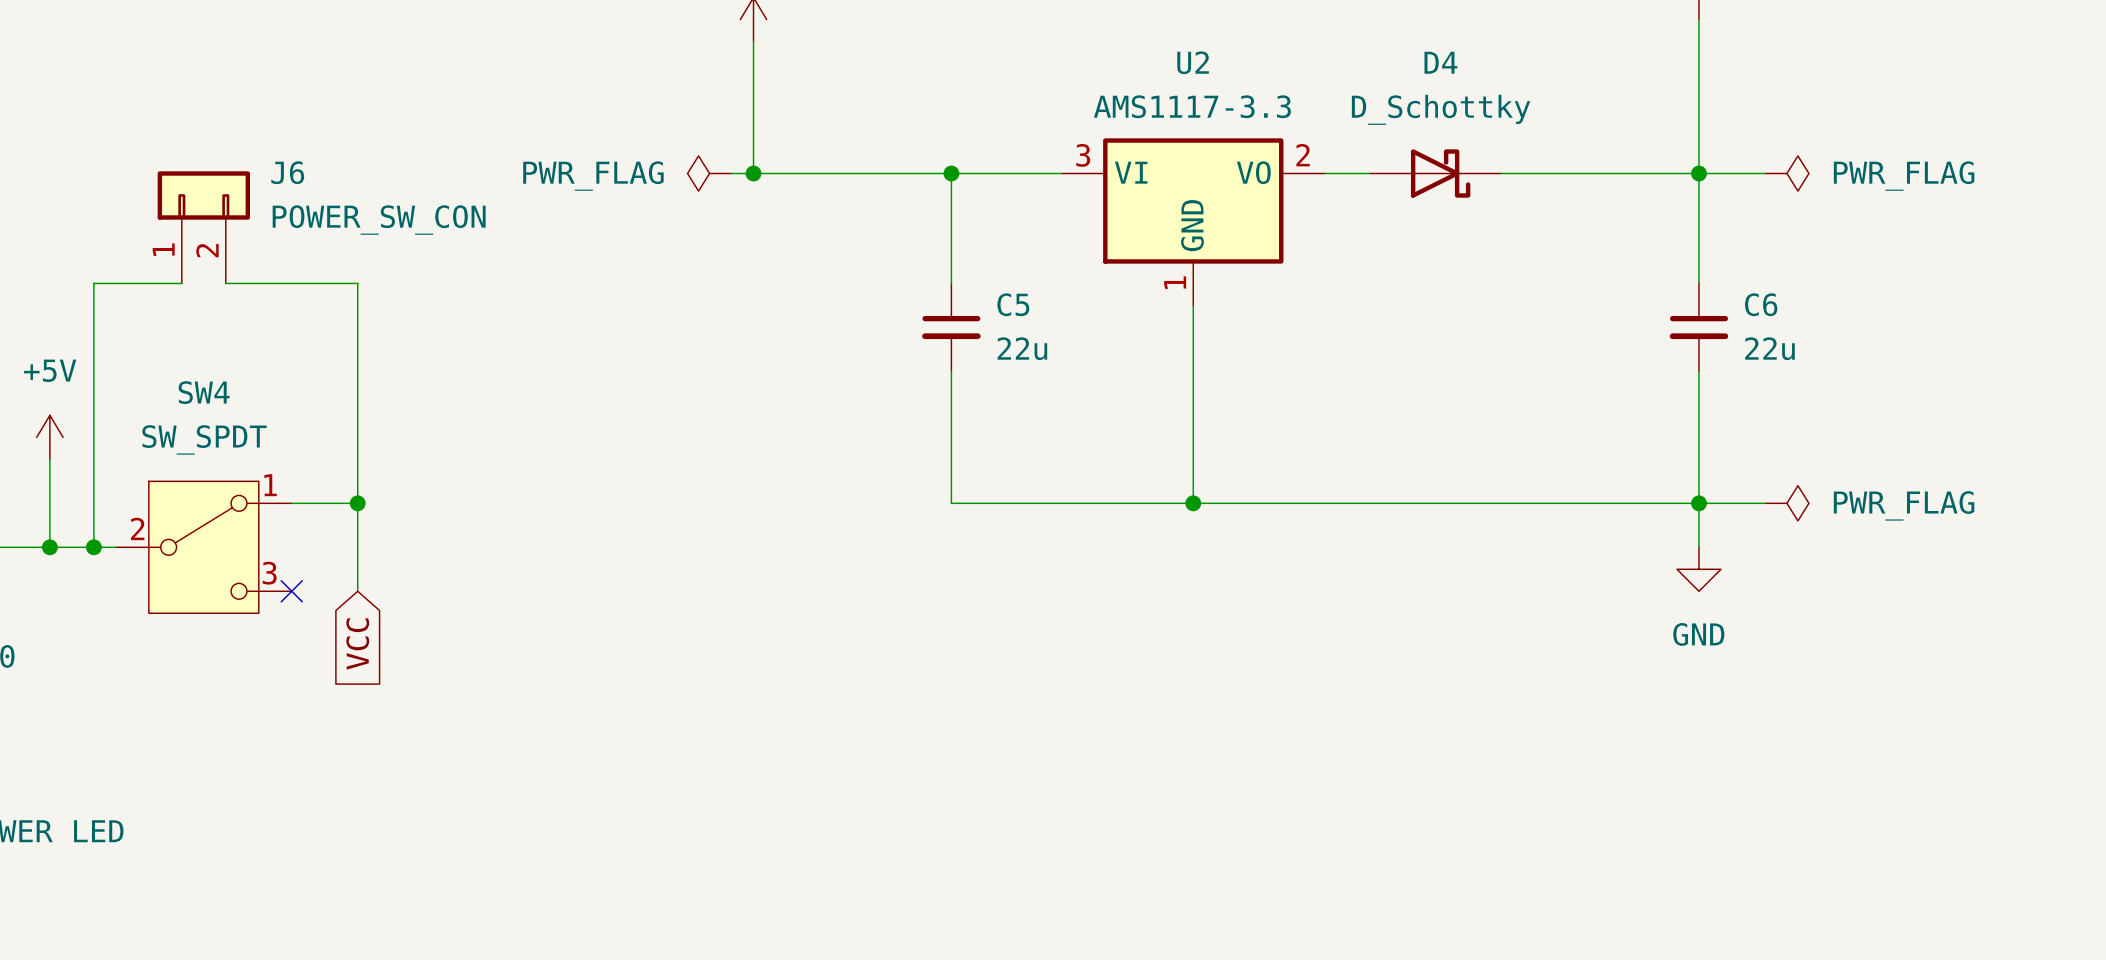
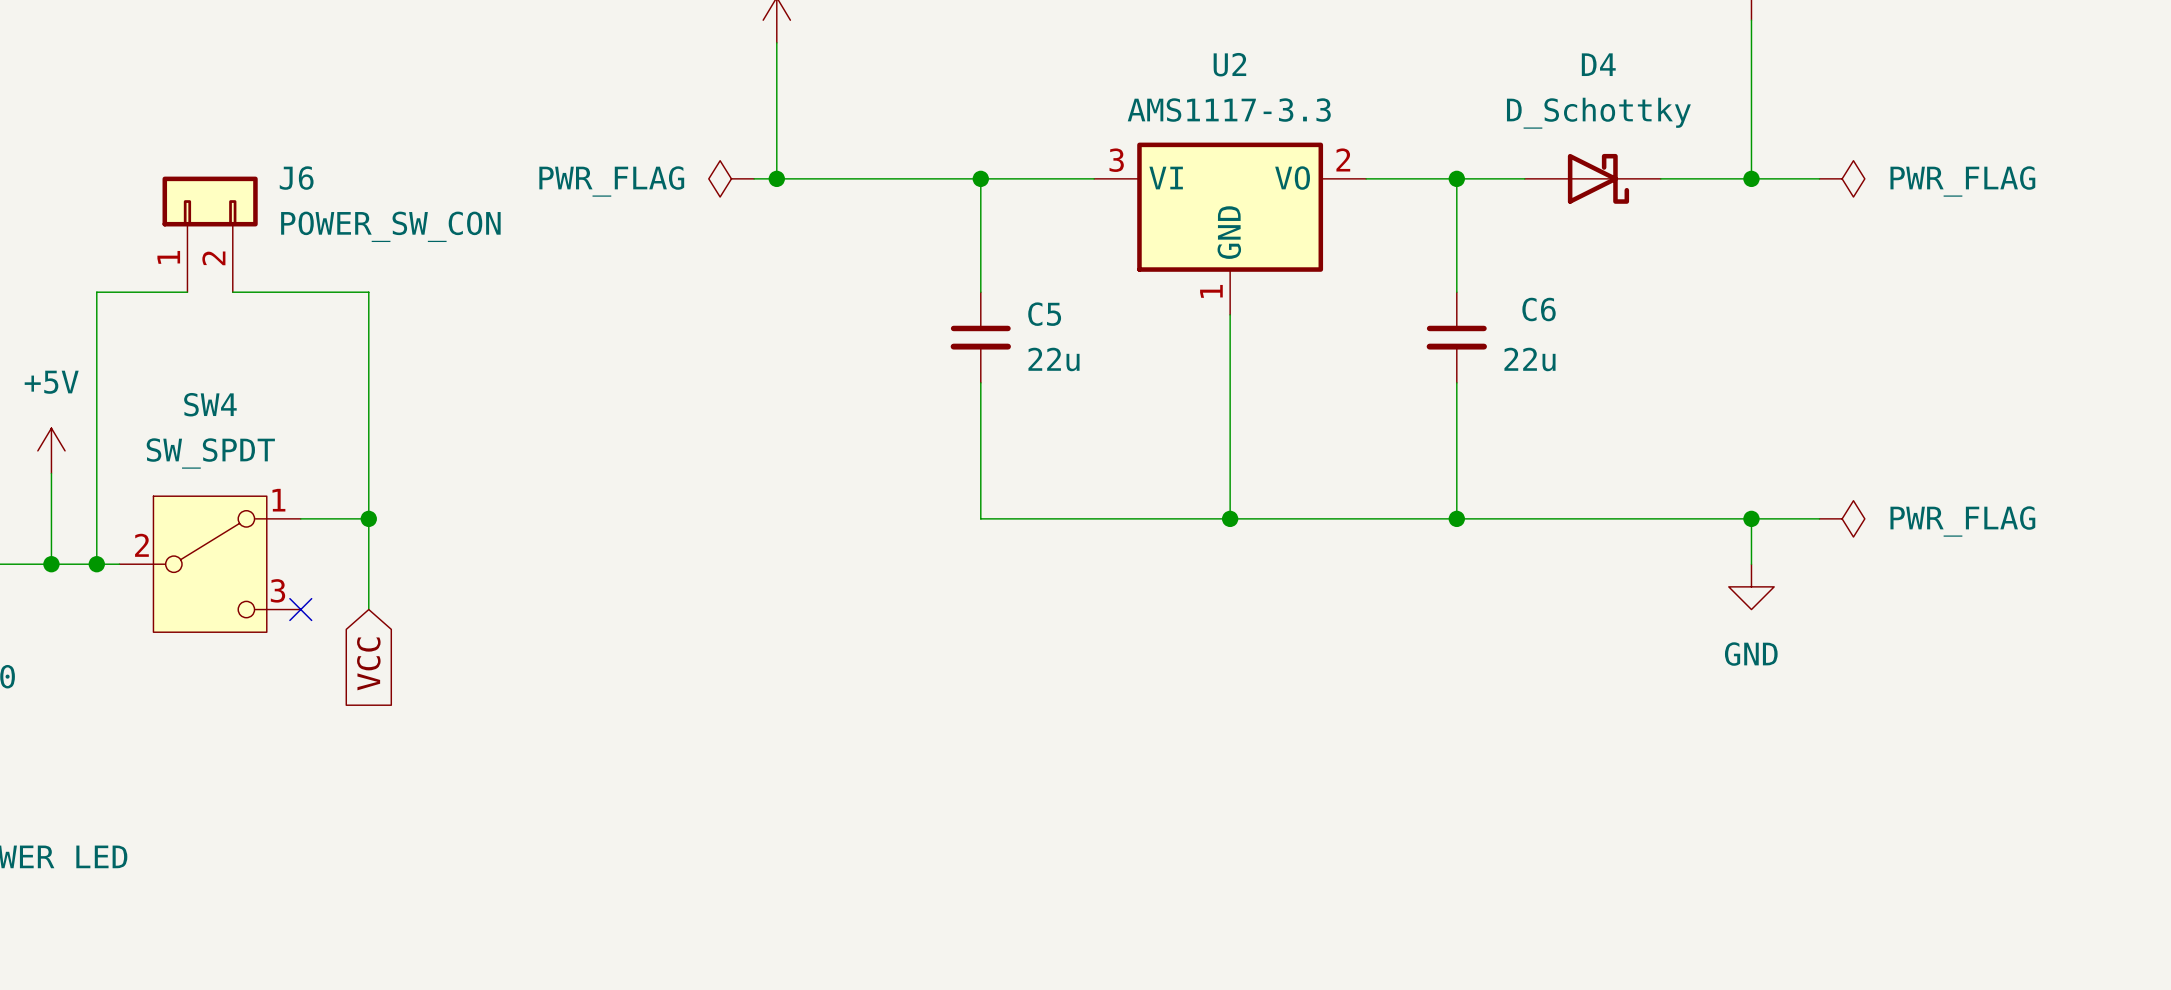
junction: none -> (1456, 178)
D4 position: (1435, 173) -> (1592, 178)
wire: (1698, 173) (1698, 283) -> (1456, 178) (1456, 292)
C6 name position: C6 (1761, 304) -> C6 (1539, 309)
C6 position: (1698, 327) -> (1456, 337)
wire: (1698, 371) (1698, 503) -> (1456, 382) (1456, 518)
junction: none -> (1456, 518)

